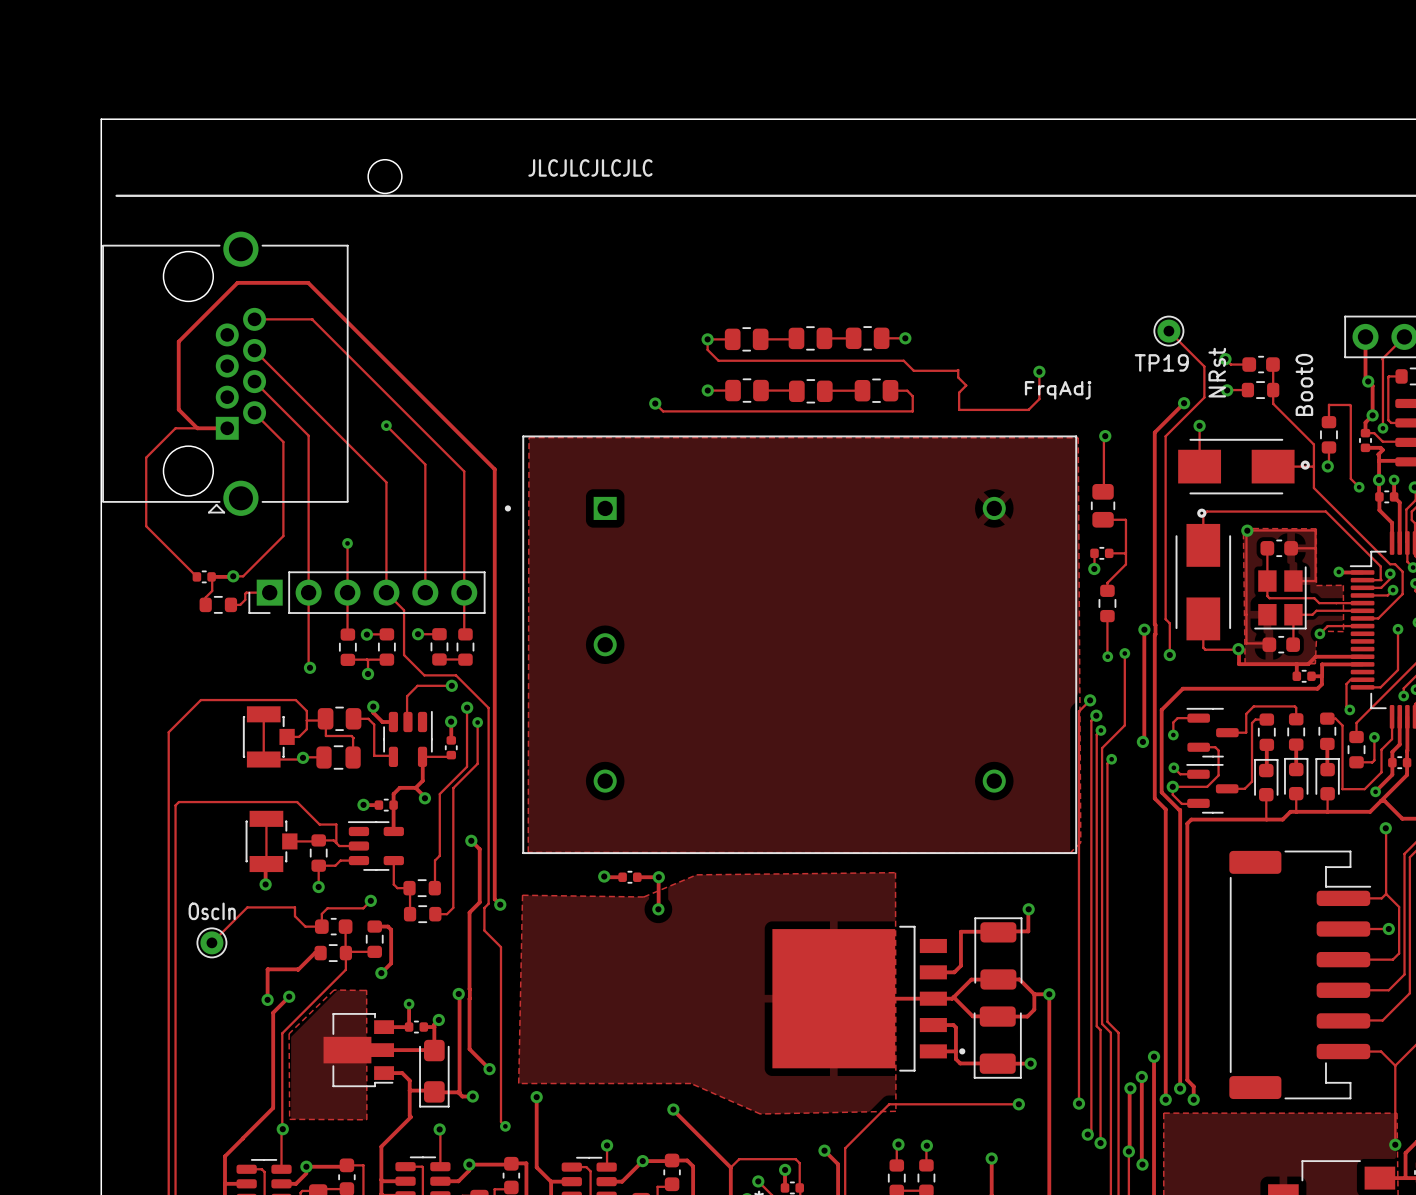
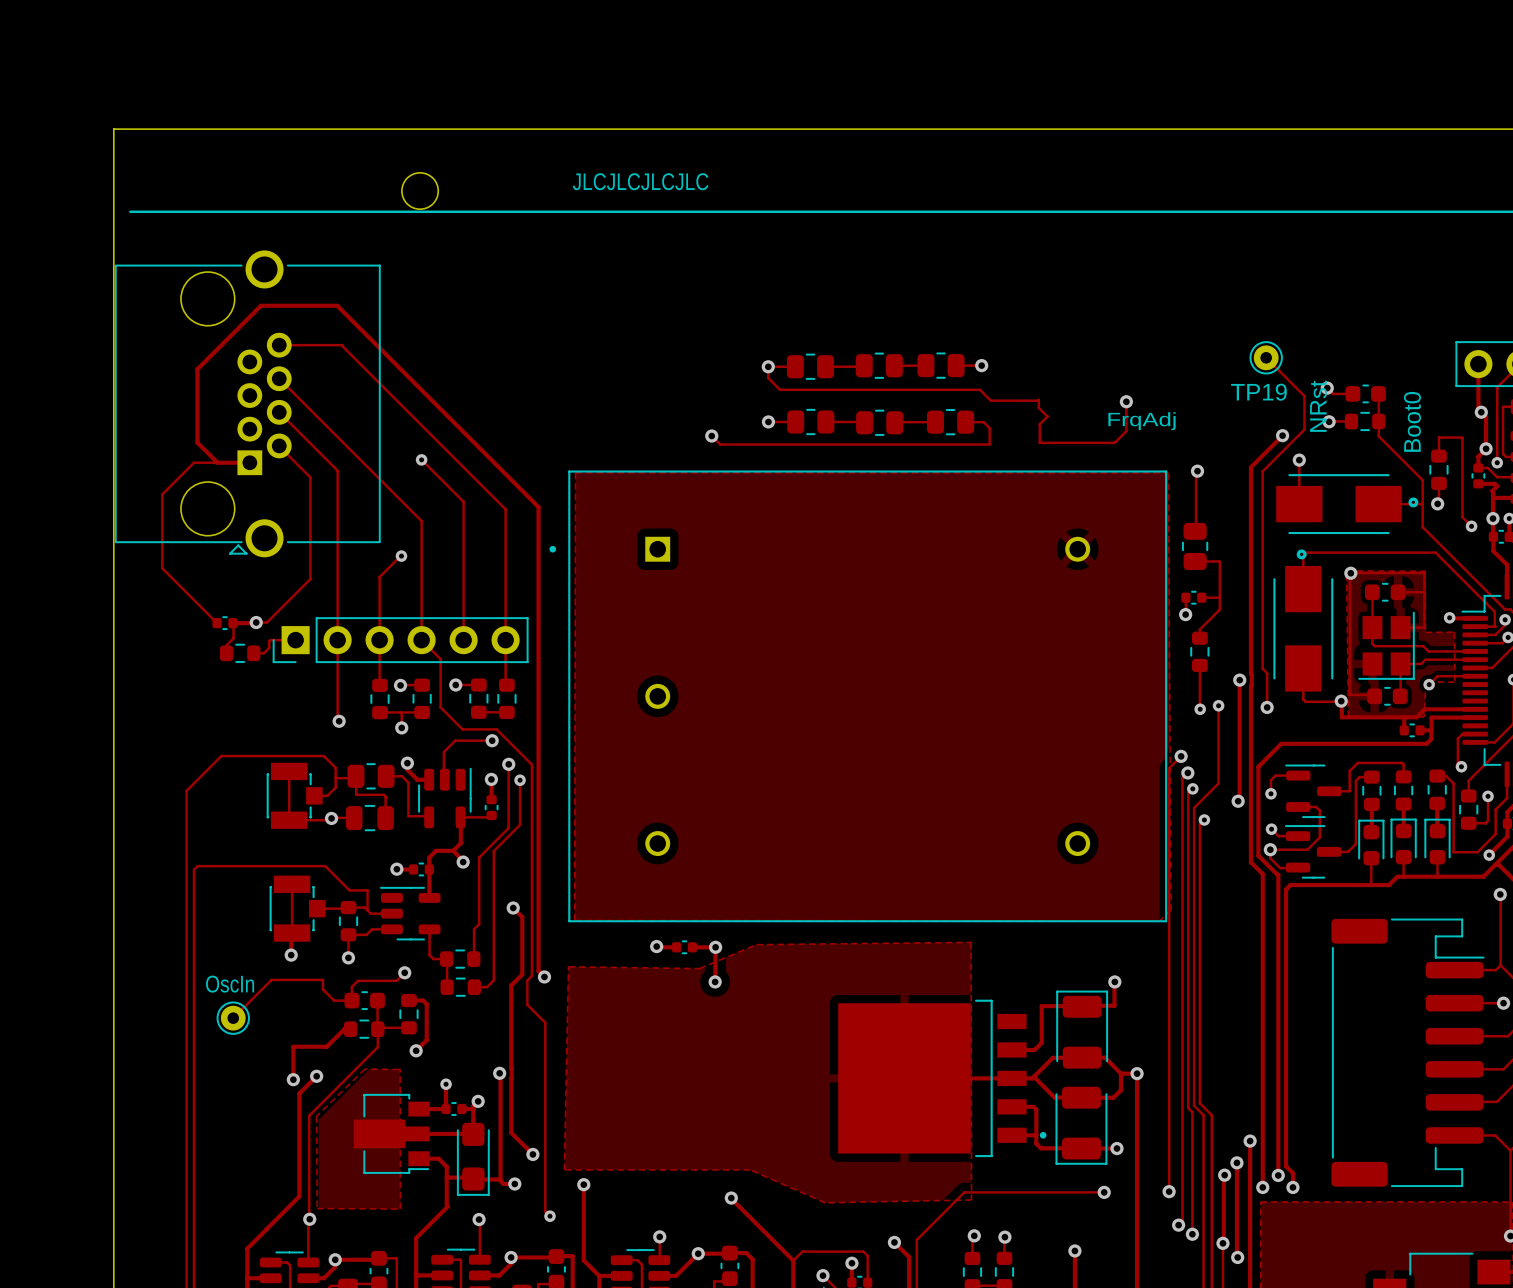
track: none -> (401, 556) (379, 577) (379, 586)
via position: (347, 543) -> (401, 556)

